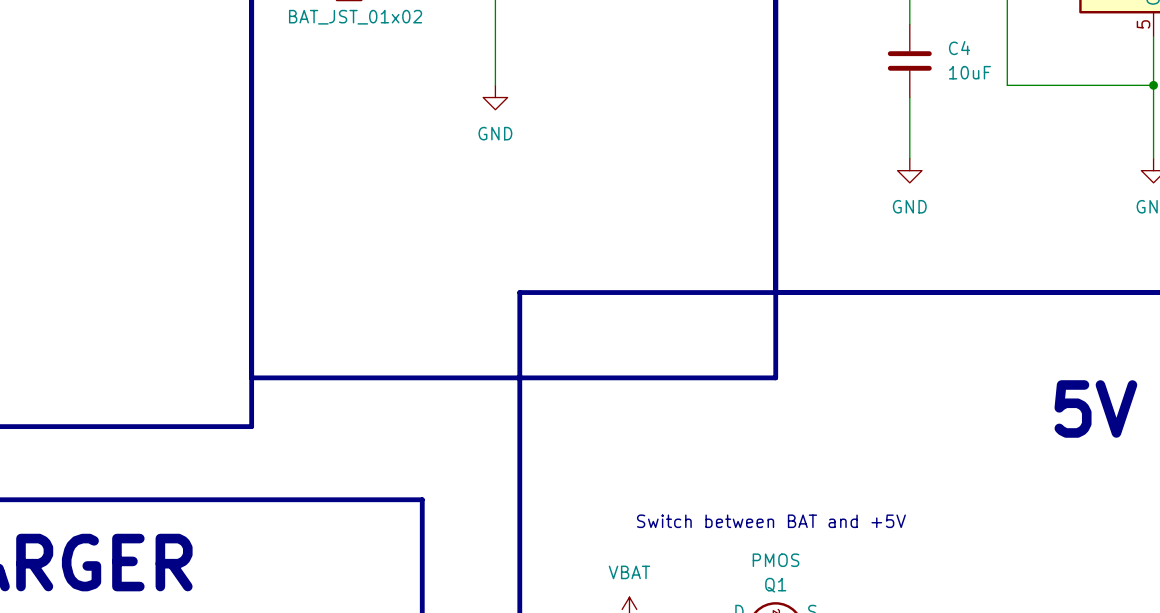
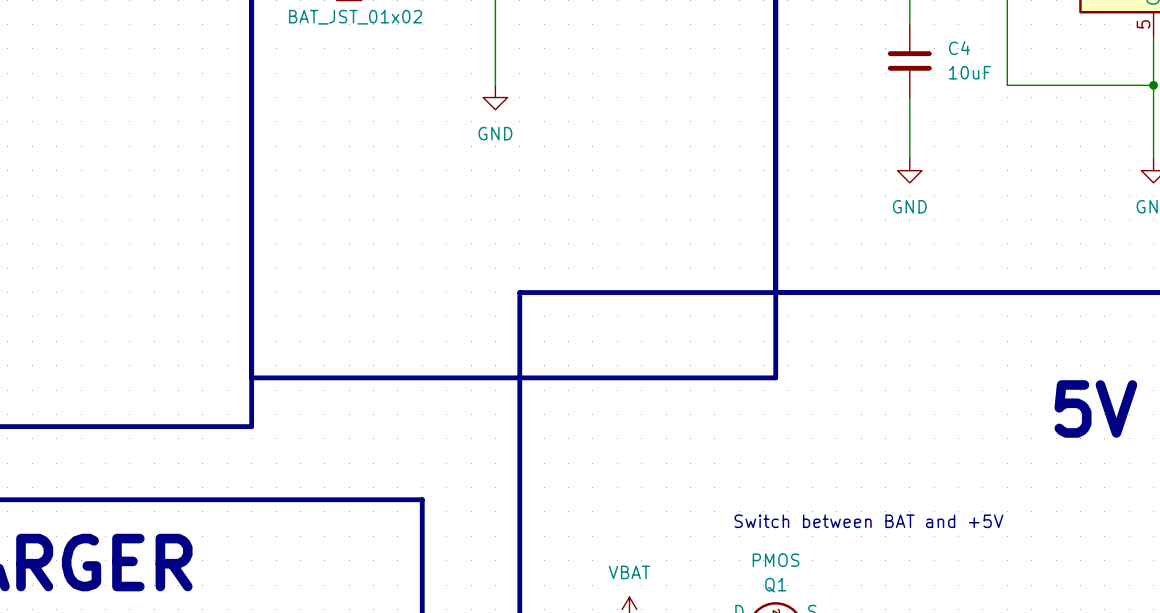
text position: Switch between BAT and +5V (771, 521) -> Switch between BAT and +5V (868, 521)

